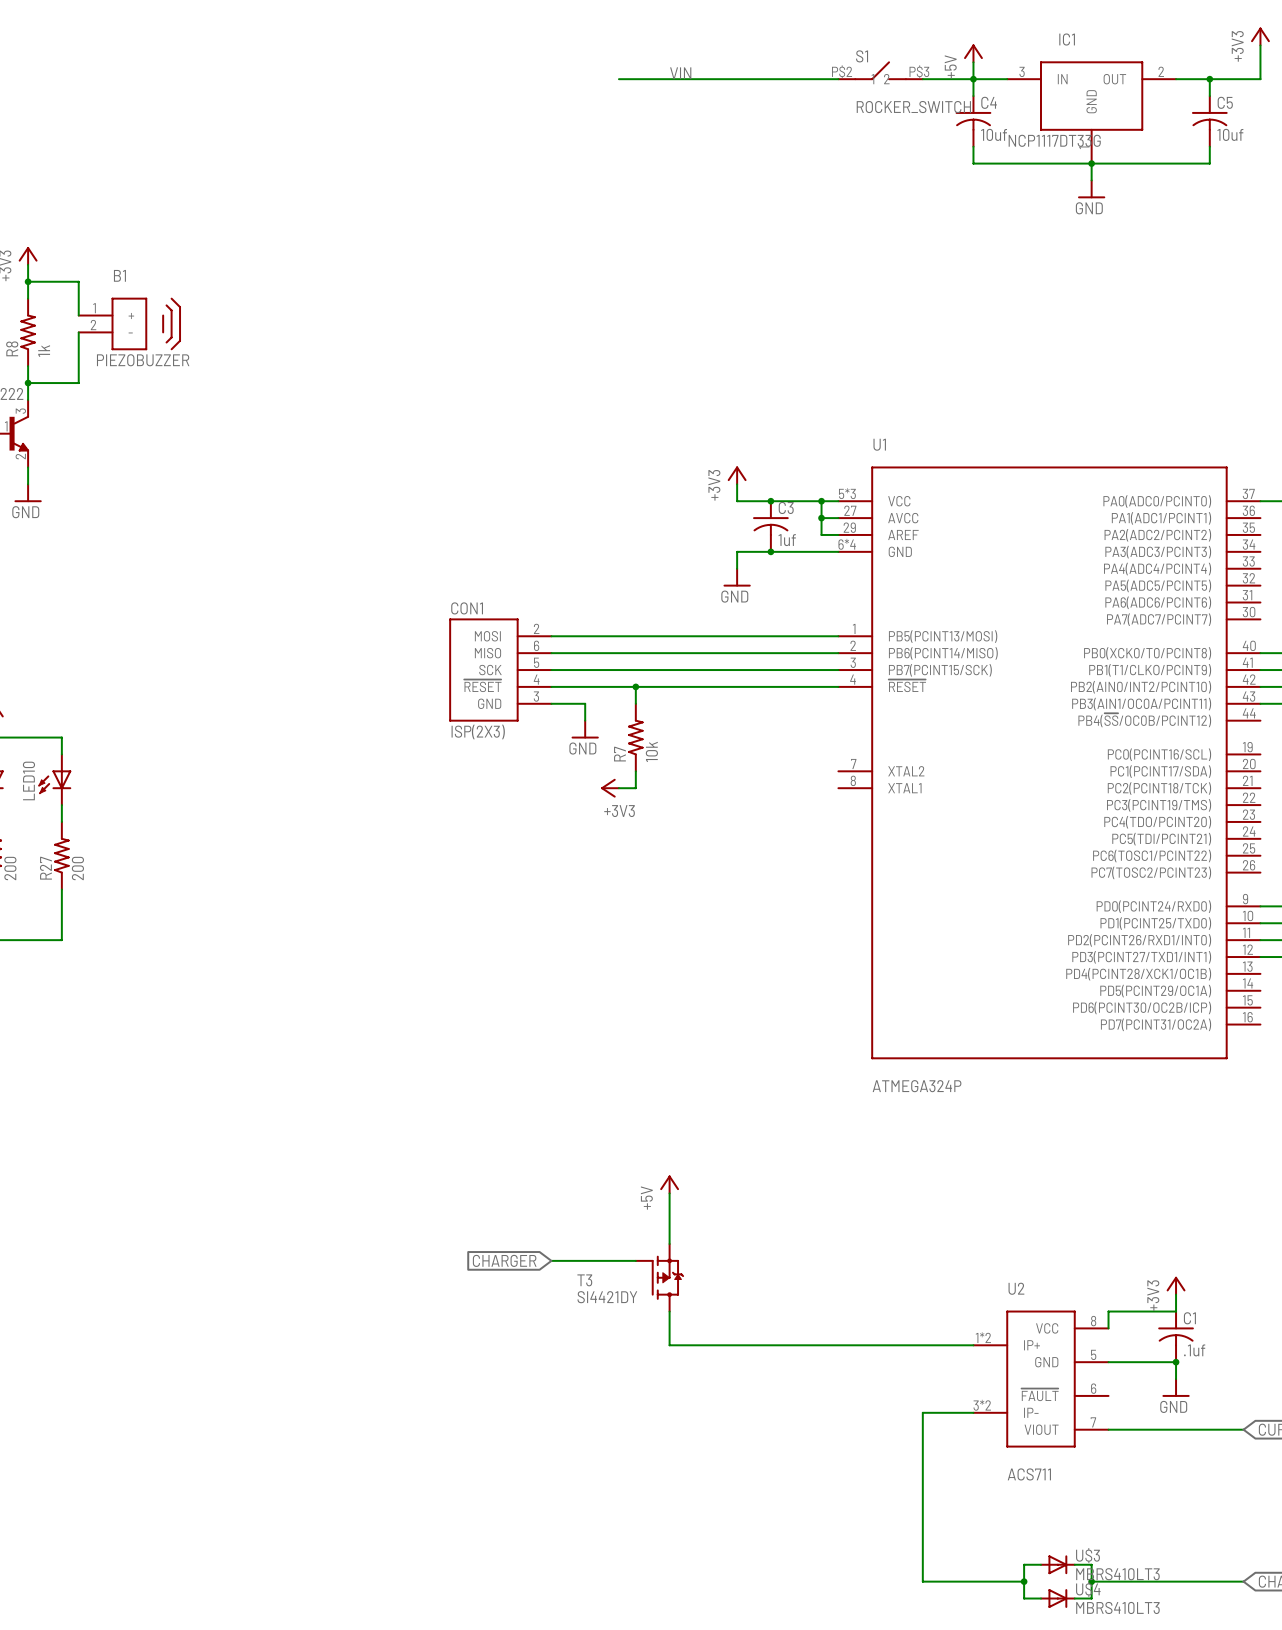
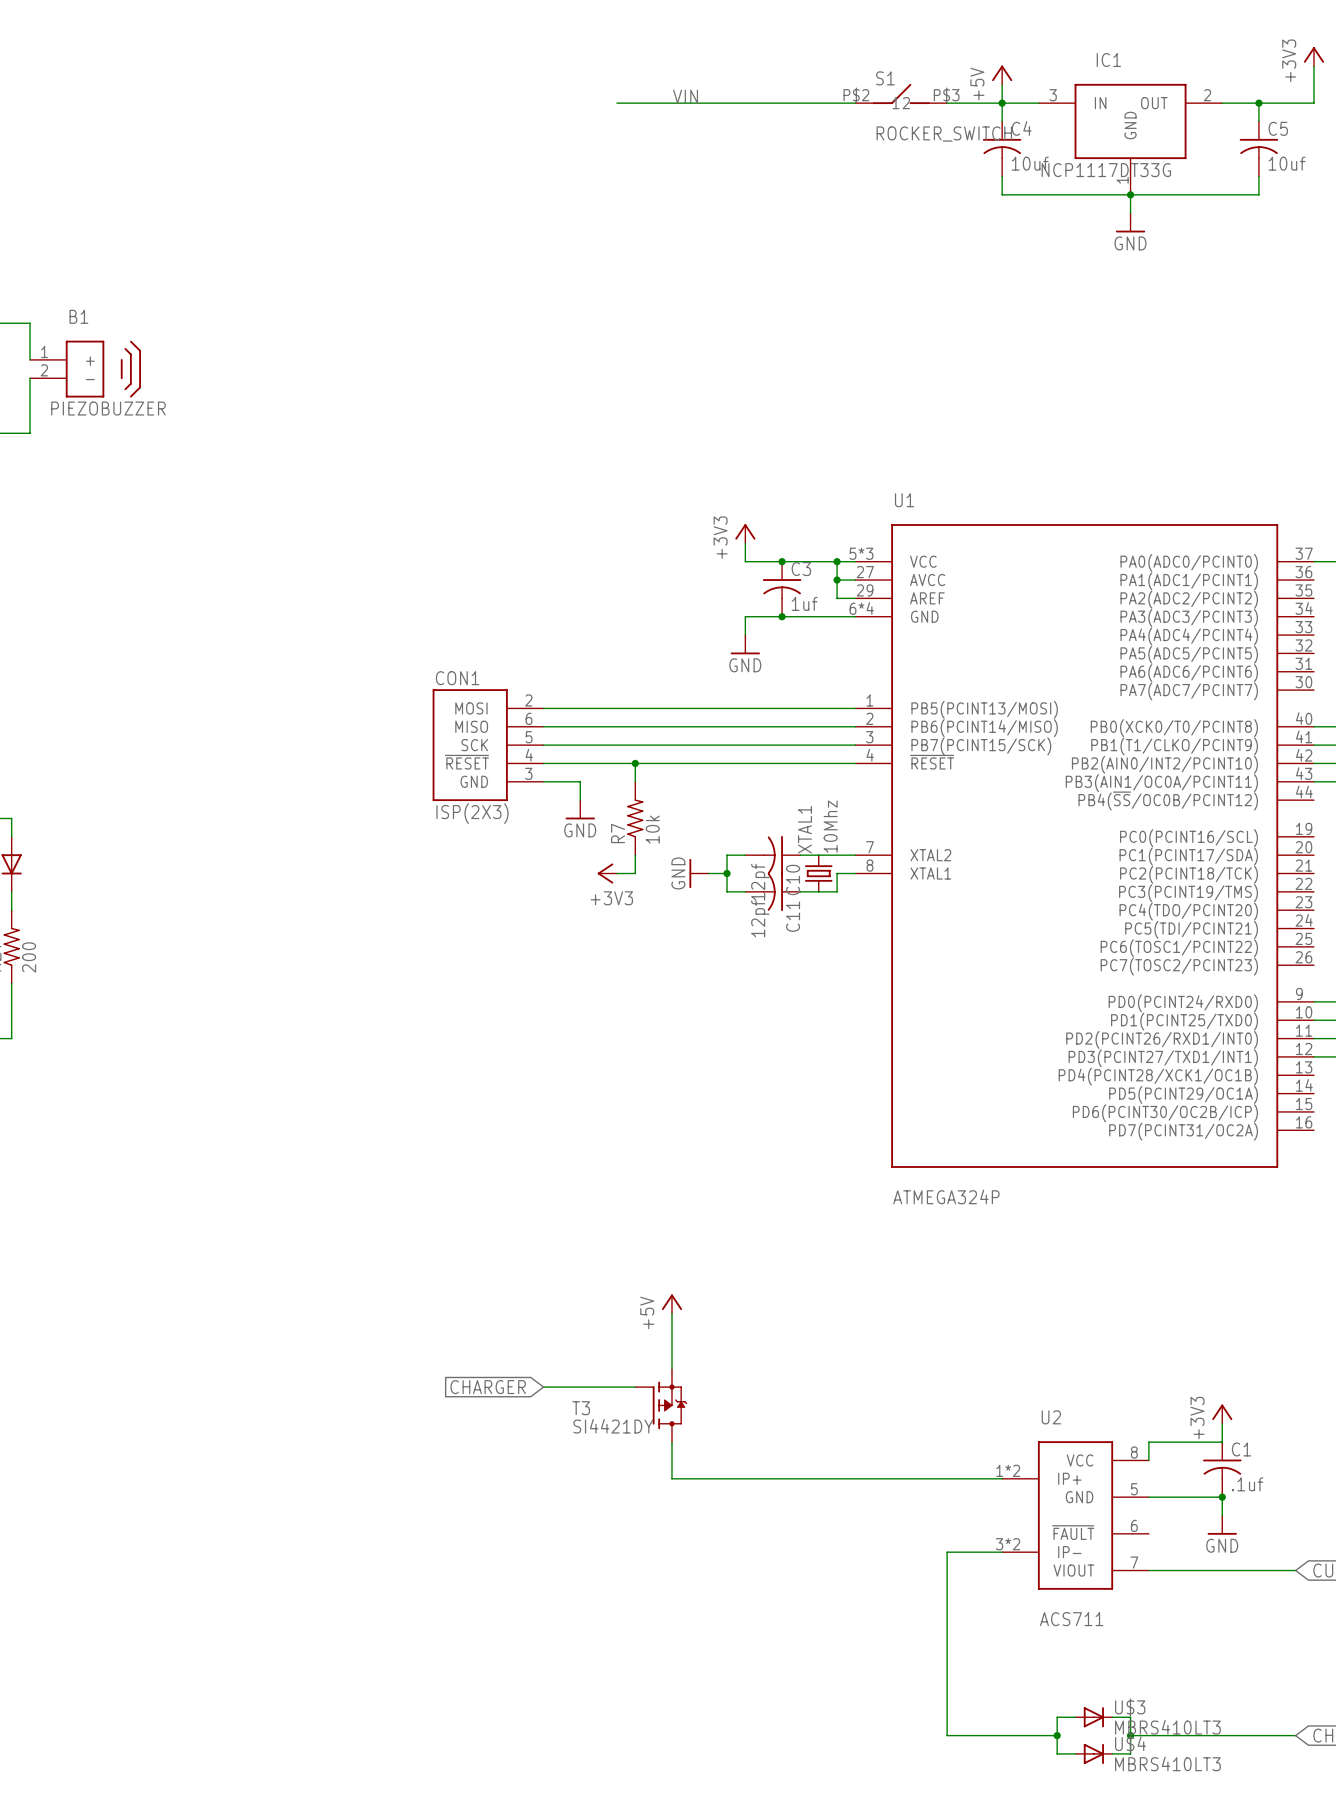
wire: none -> (745, 855) (727, 855) (727, 891) (745, 891)
C10: none -> 12pf (772, 855)
wire: none -> (800, 855) (855, 855)
power symbol: none -> GND (699, 873)
wire: none -> (708, 873) (727, 873)
junction: none -> (727, 873)
XTAL1: none -> 10Mhz (818, 873)
wire: none -> (855, 873) (837, 873) (837, 891) (800, 891)
C11: none -> 12pf (772, 891)

